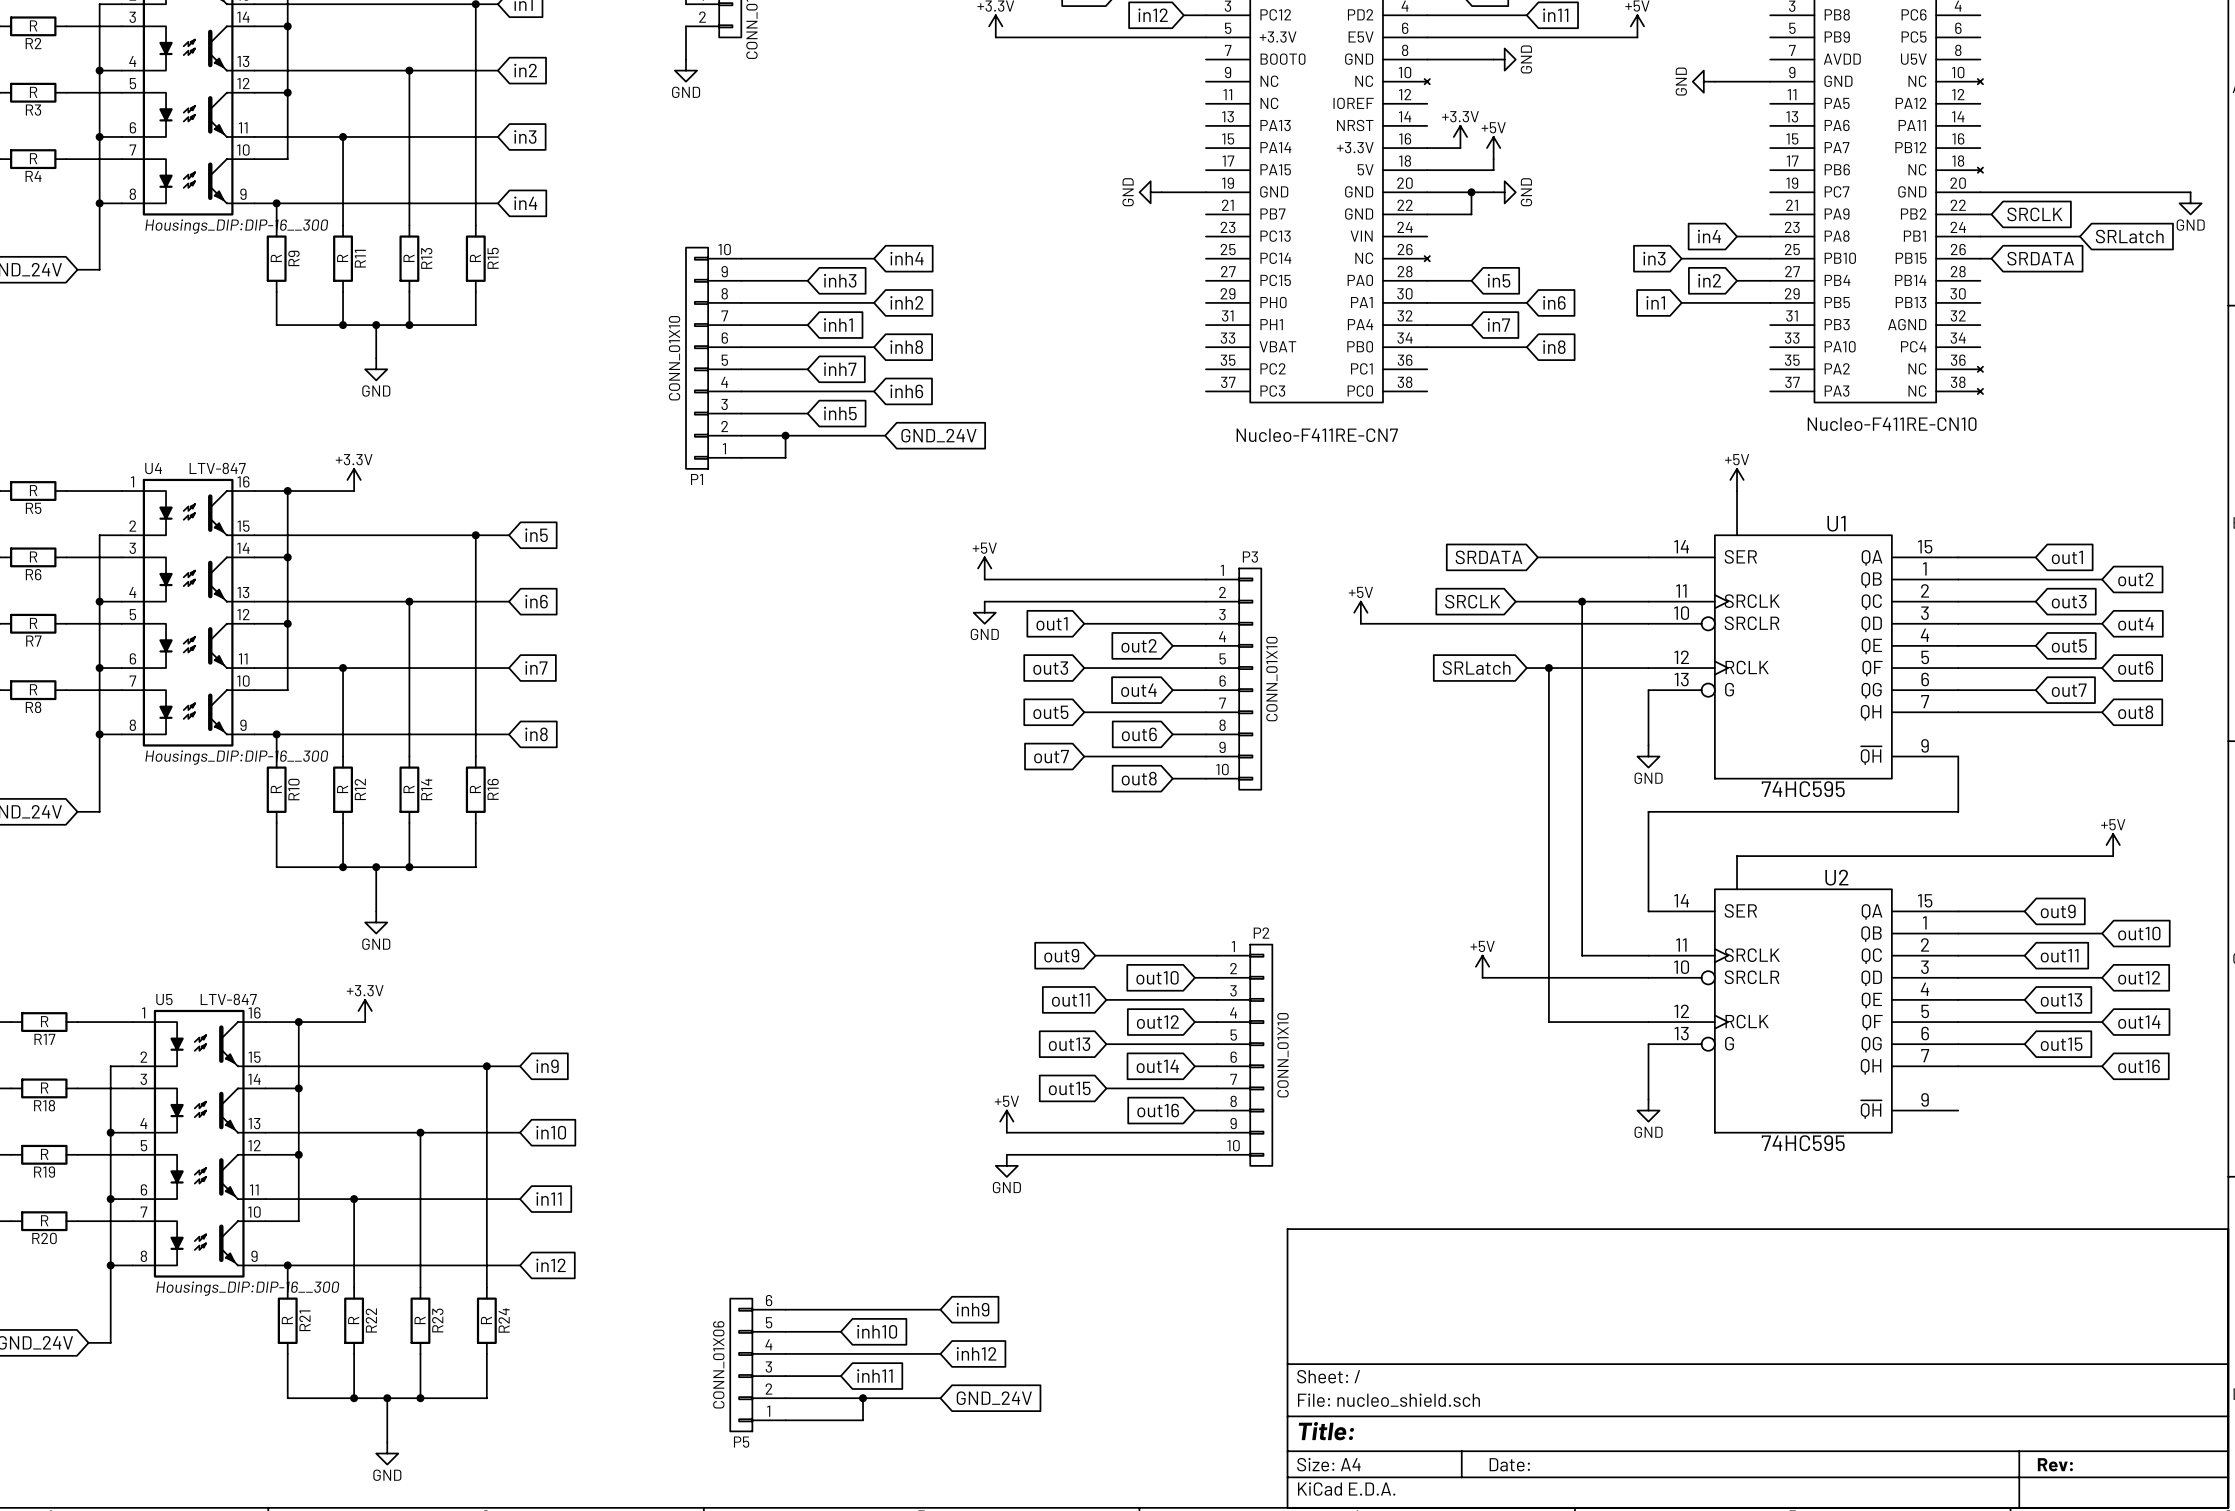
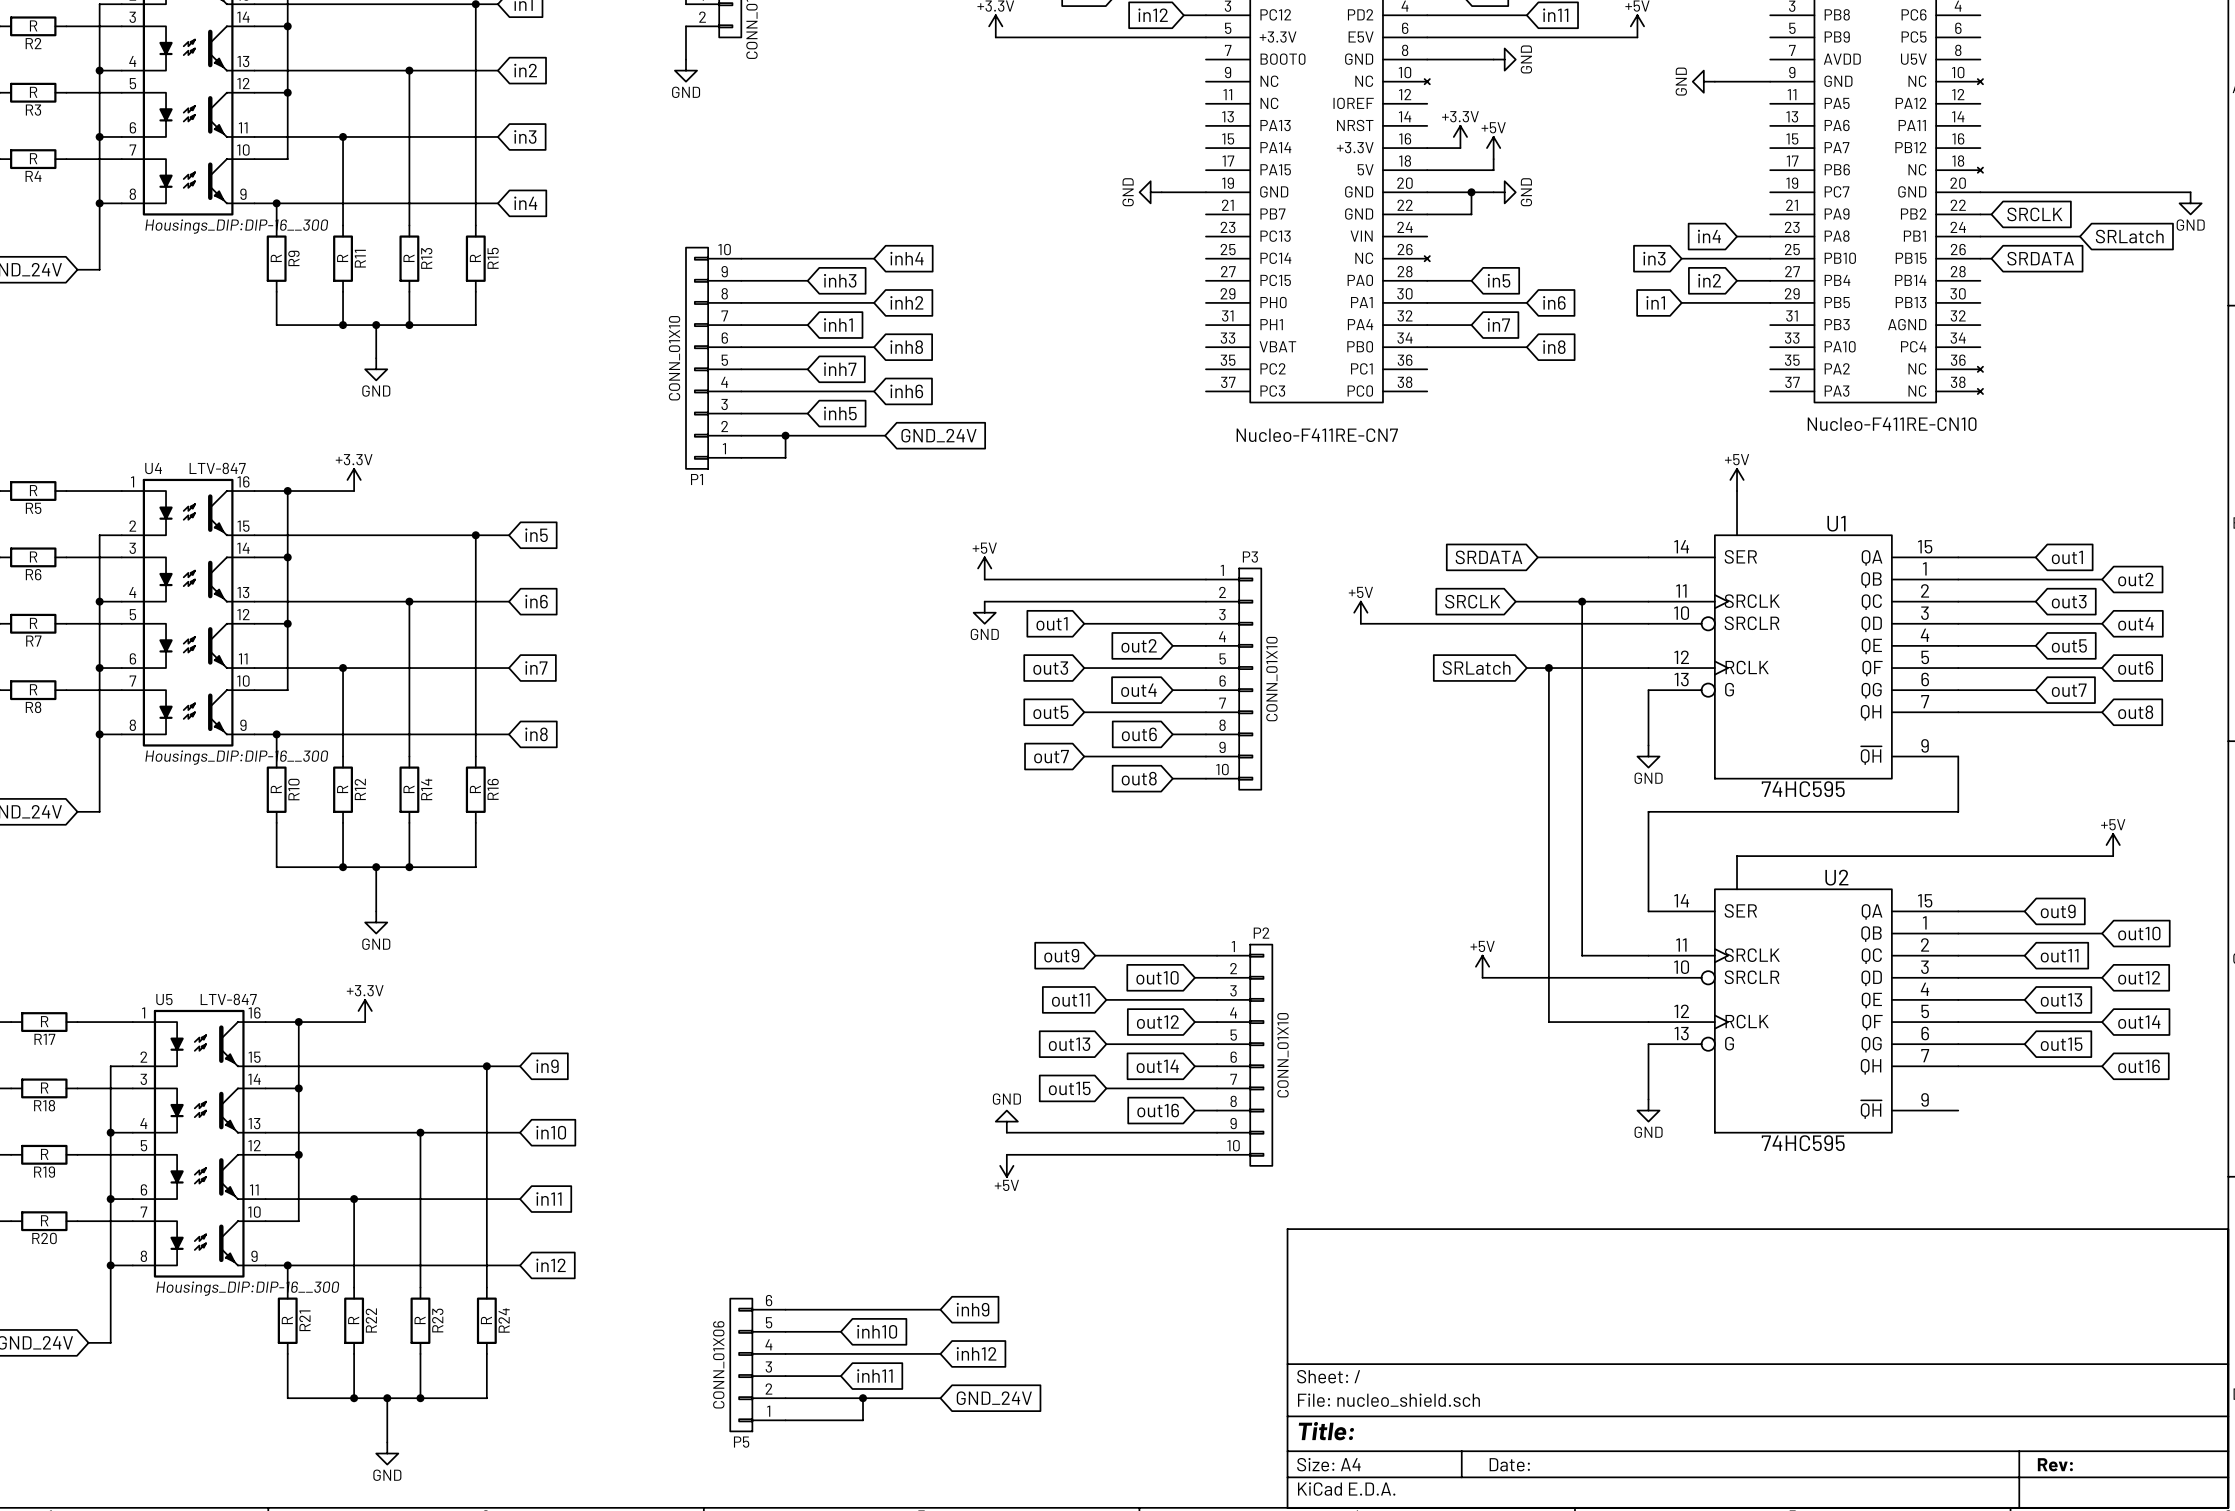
power symbol: +5V (1006, 1121) -> GND (1006, 1121)
power symbol: GND (1006, 1165) -> +5V (1006, 1165)

